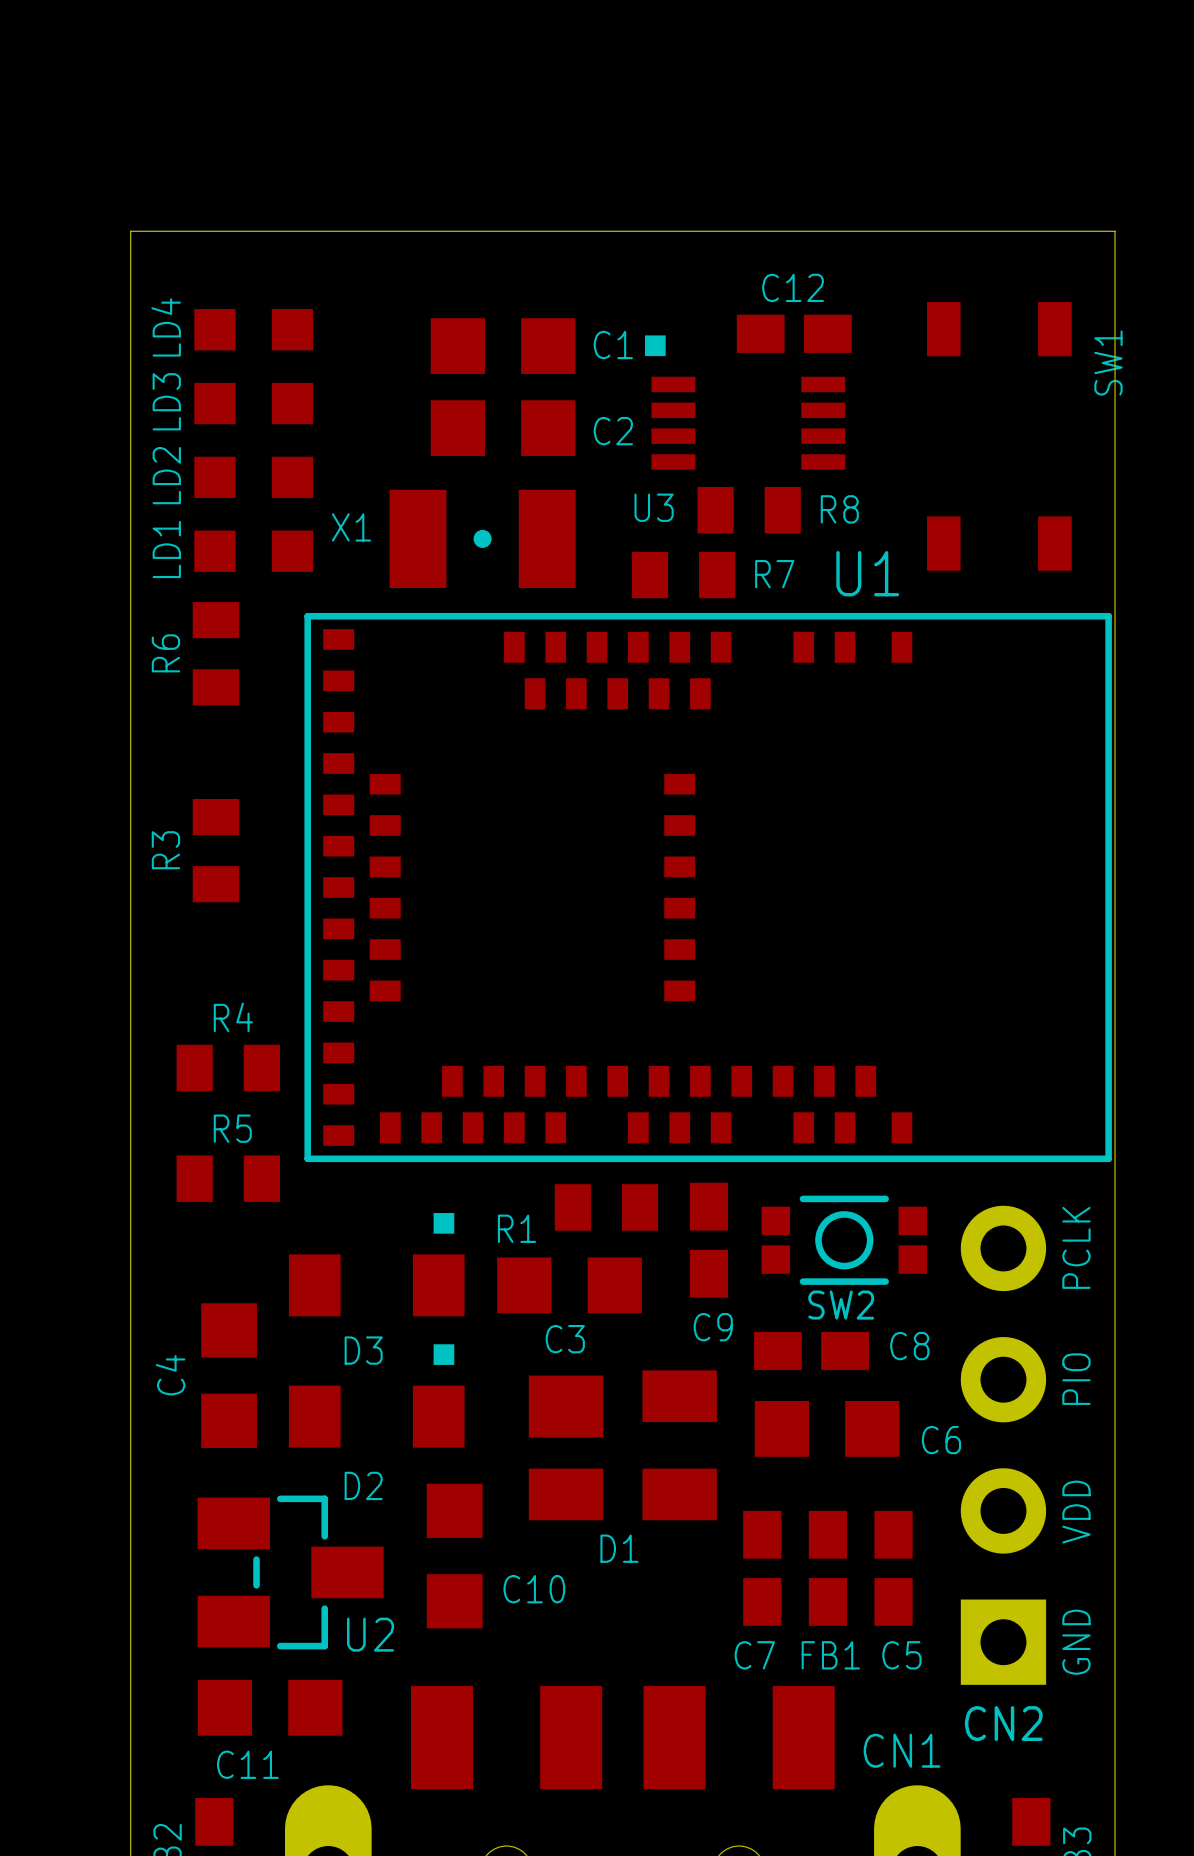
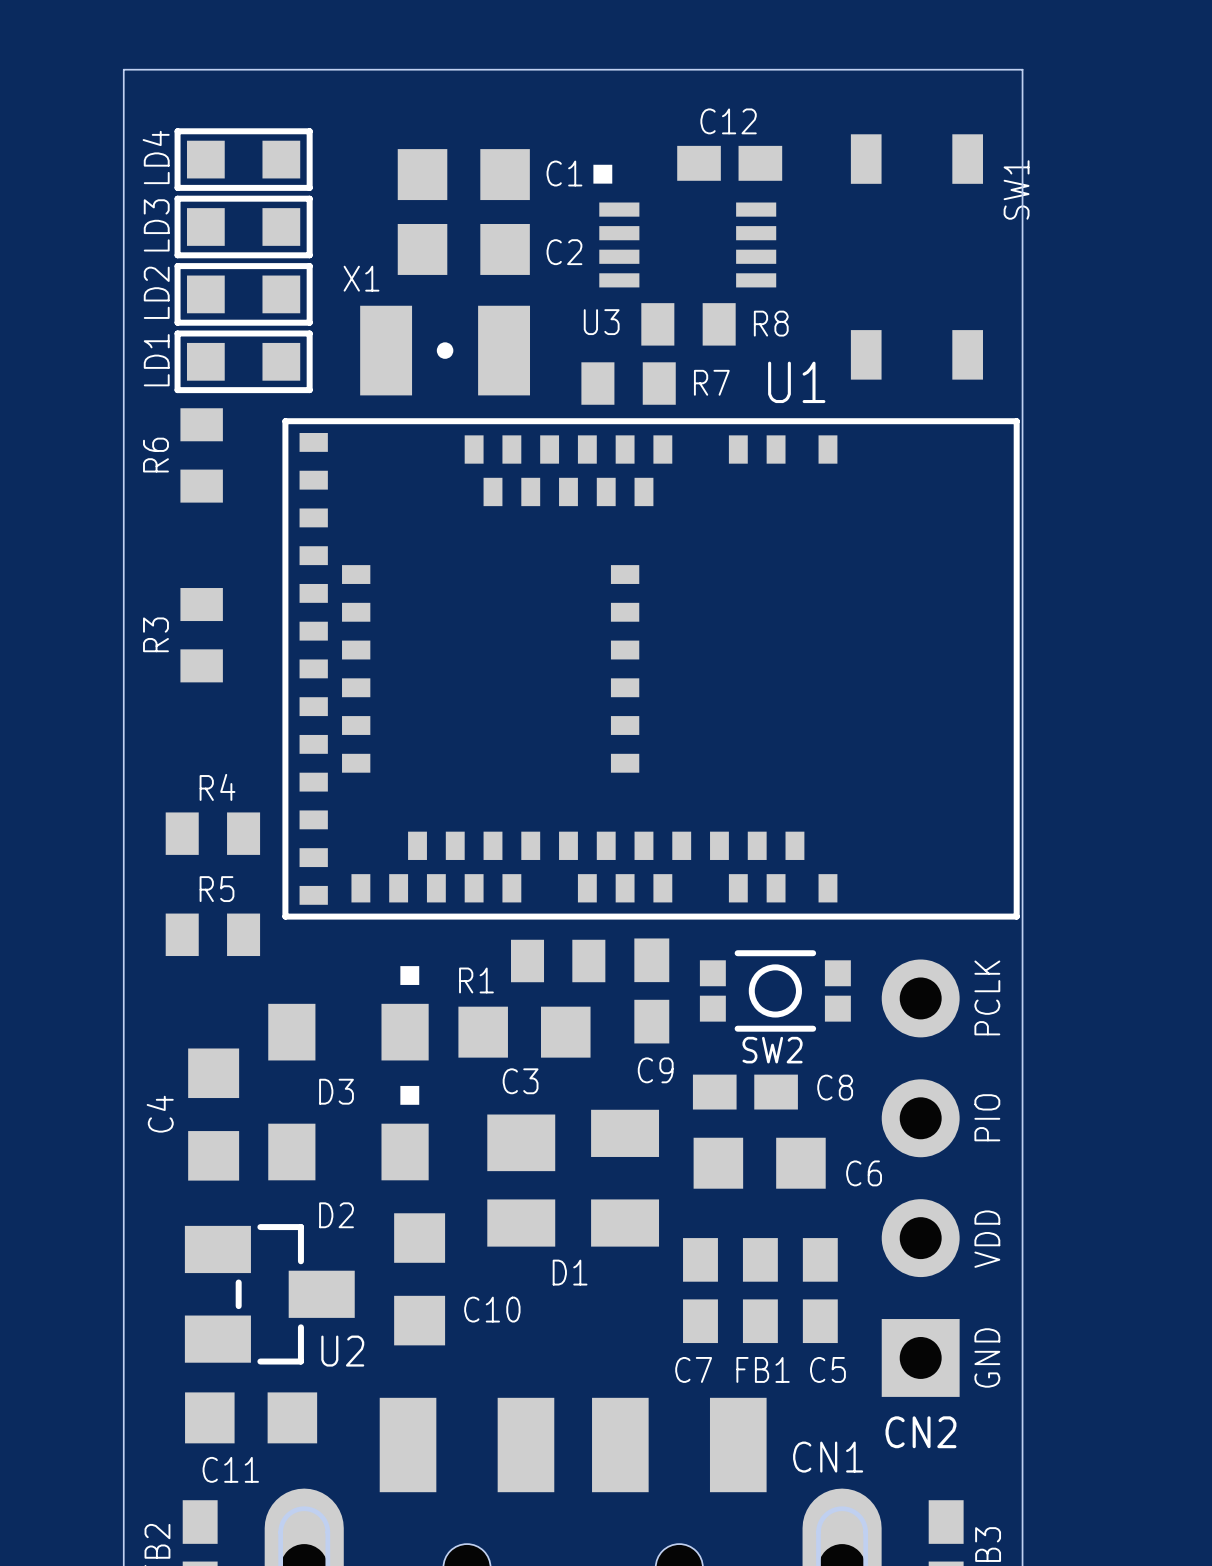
LD4 footprint: [194, 309, 314, 351] -> [174, 128, 313, 191]
LD3 footprint: [194, 382, 314, 425] -> [174, 195, 313, 259]
LD2 footprint: [194, 456, 314, 499] -> [174, 263, 313, 326]
X1 name position: X1 (351, 527) -> X1 (361, 278)
LD1 footprint: [194, 530, 314, 572] -> [174, 330, 313, 394]

